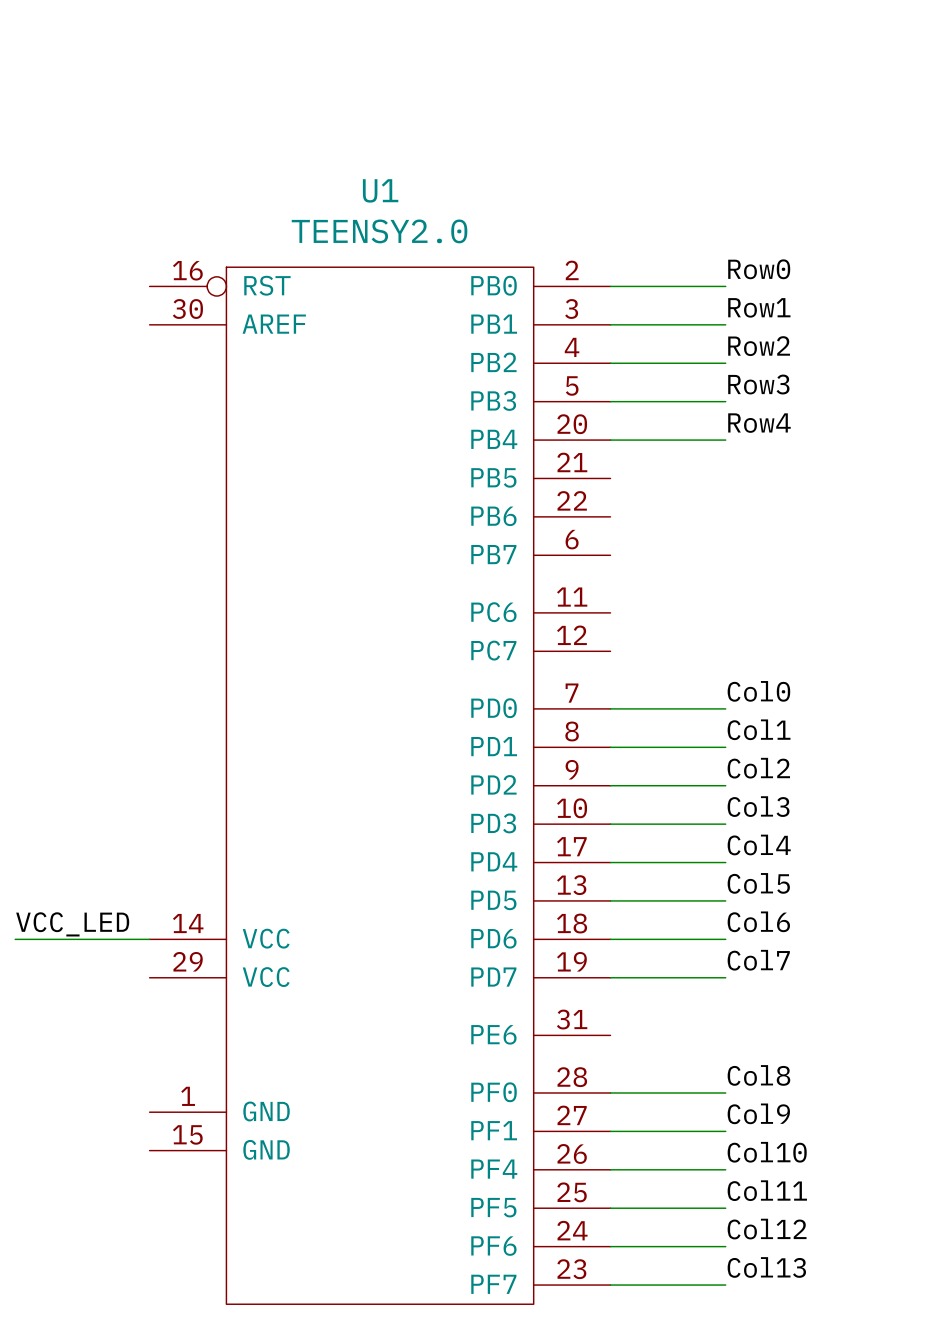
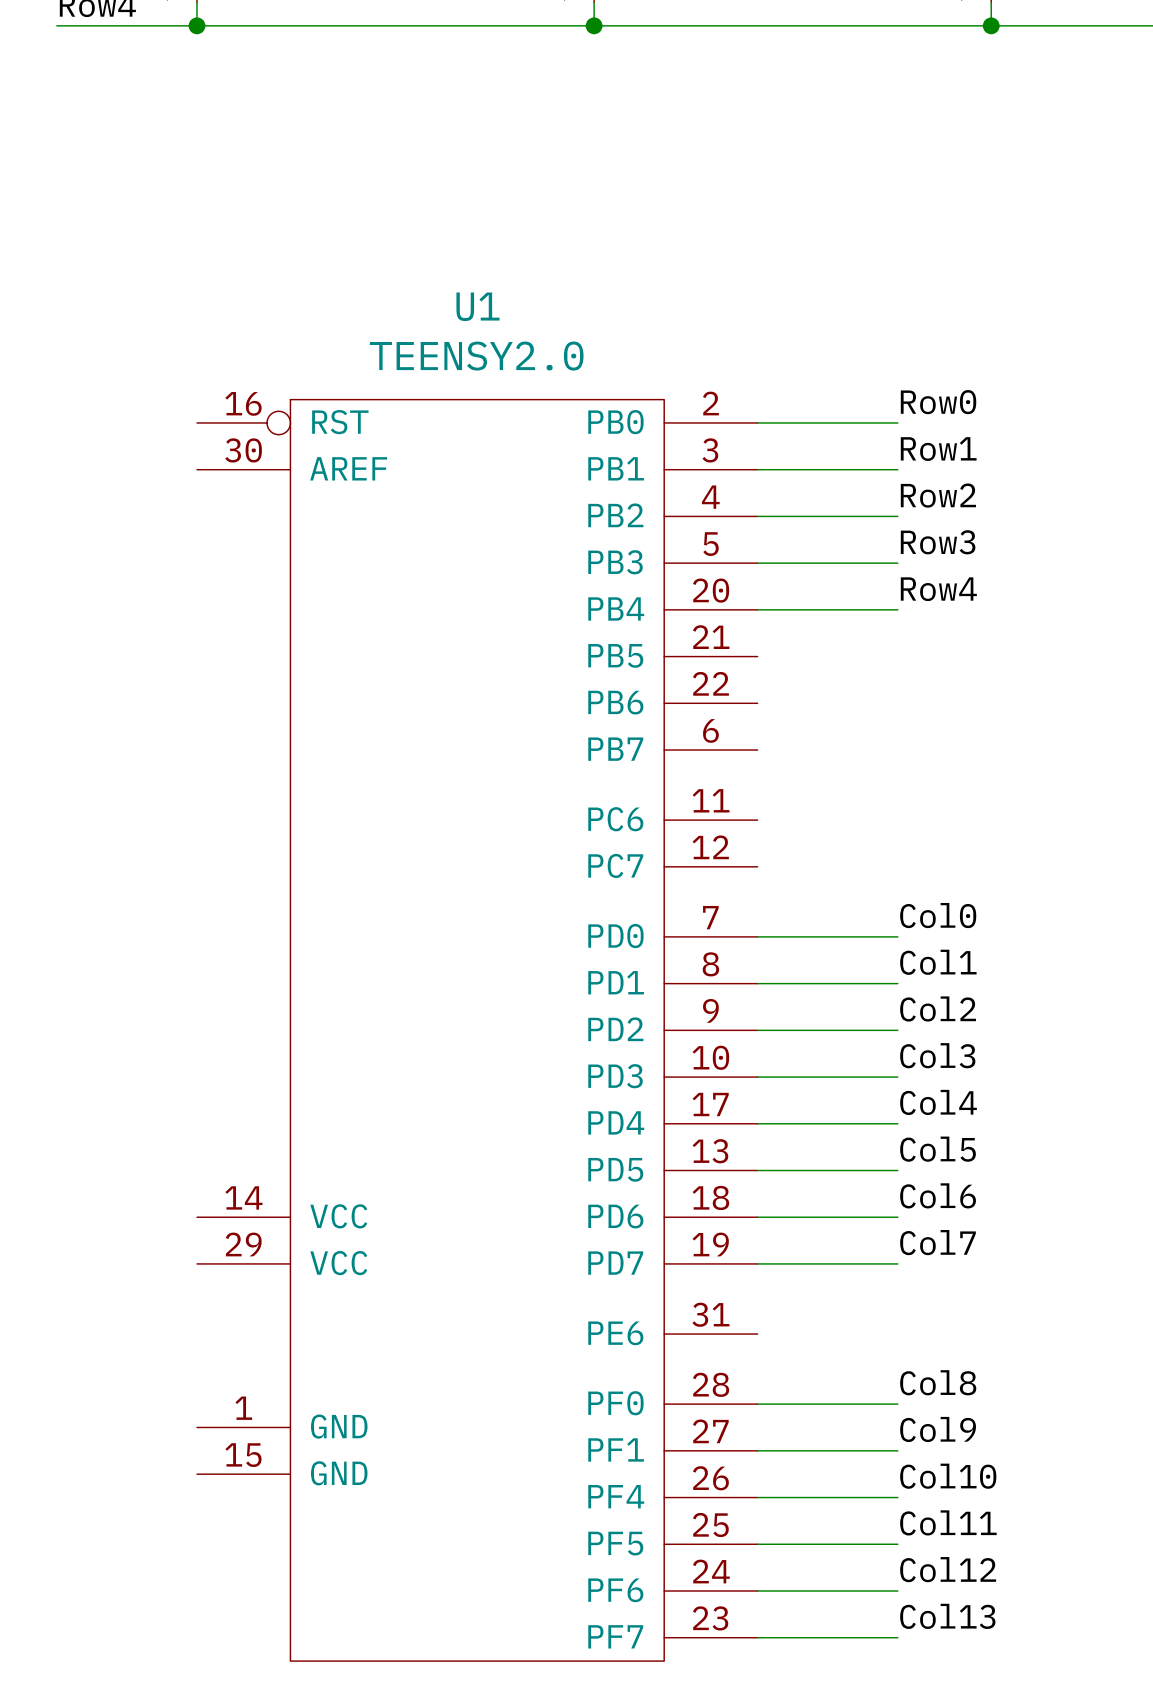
label: VCC_LED (72, 924) -> none
wire: (15, 939) (149, 939) -> none

